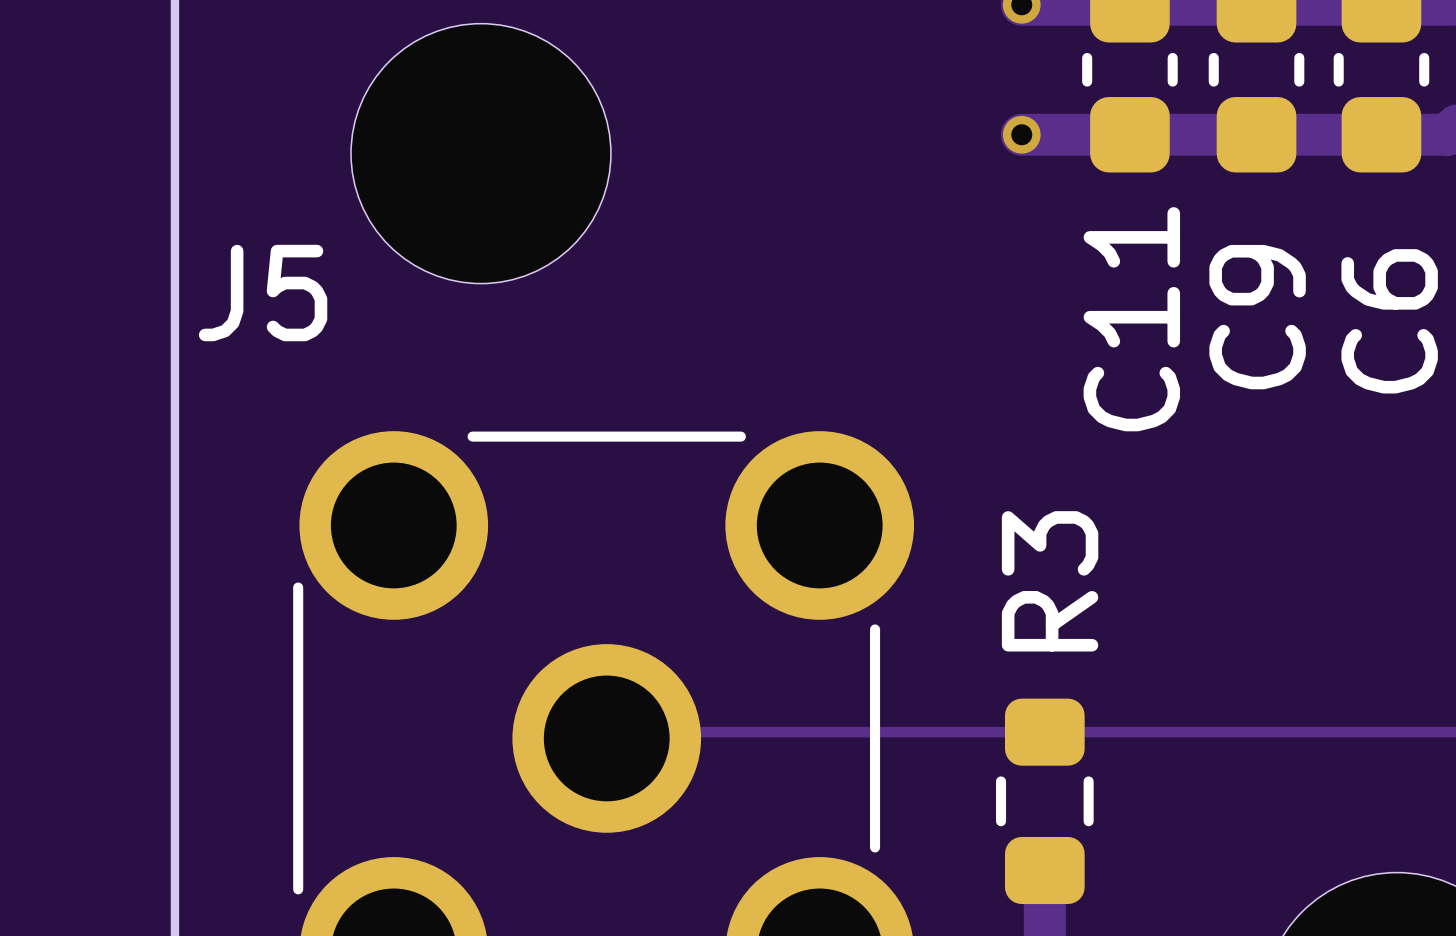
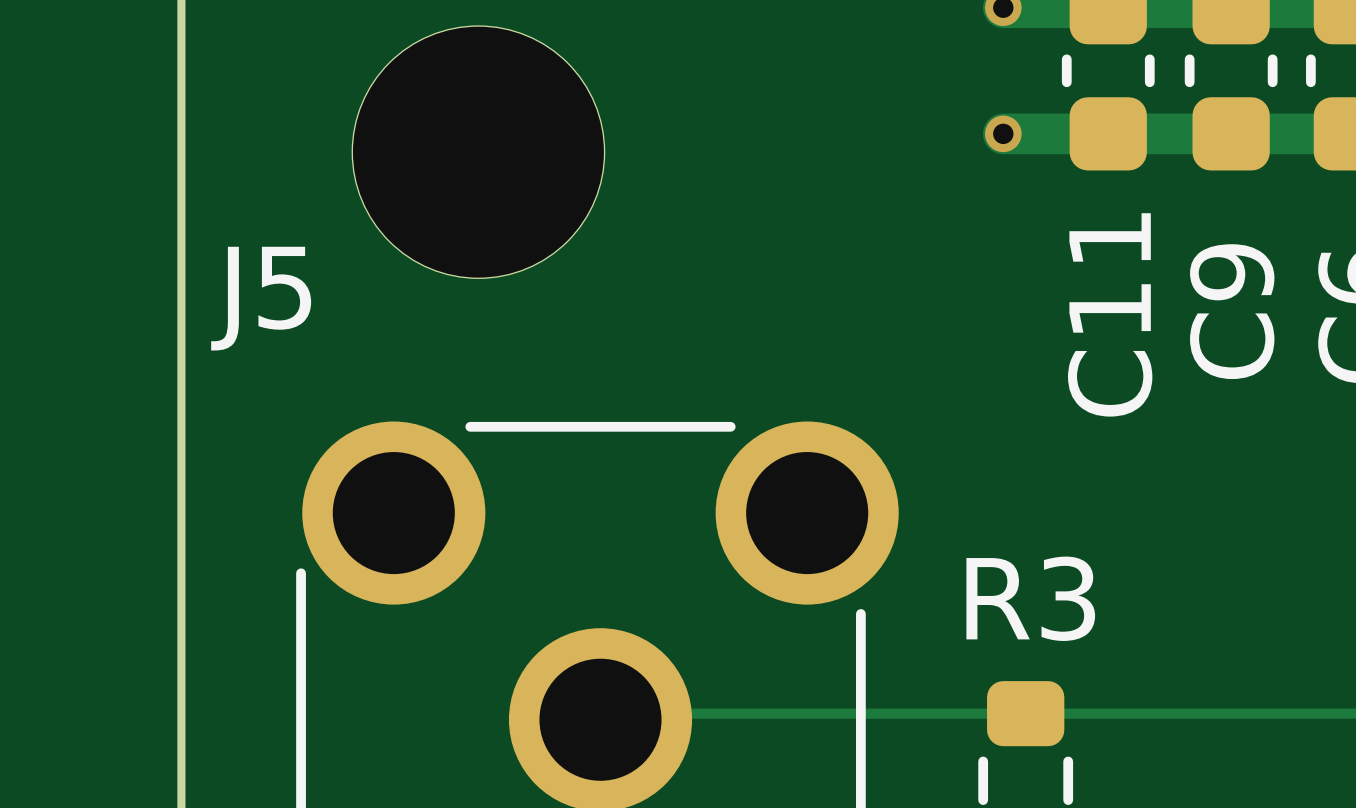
R3 name rotation: 0° (1050, 581) -> 90° clockwise (1030, 598)

